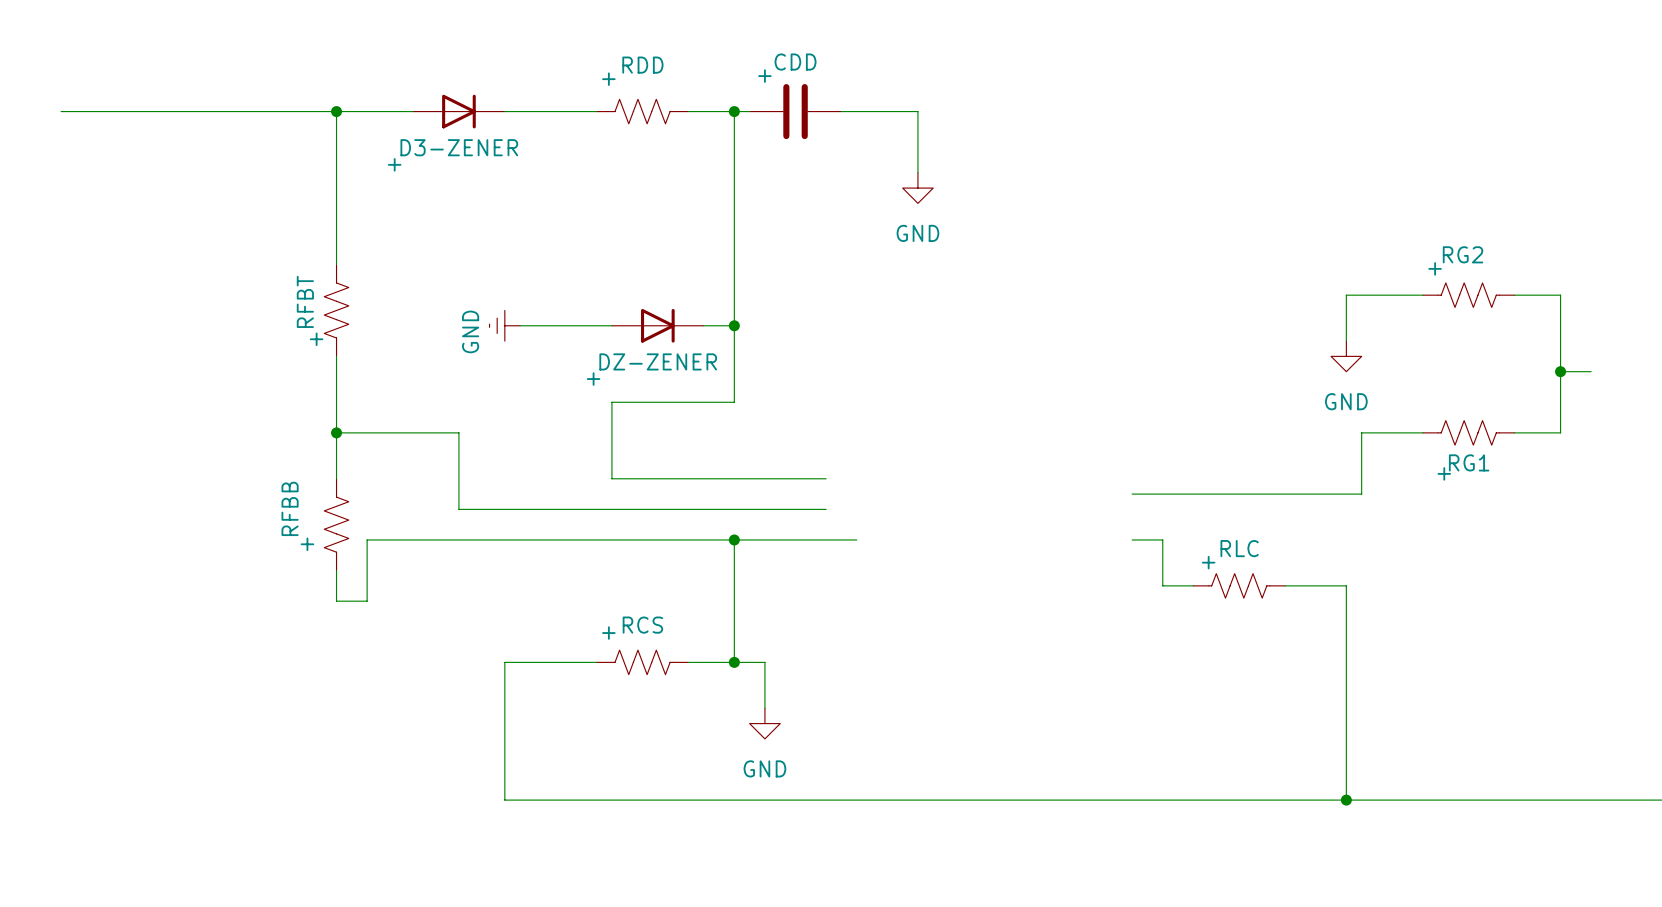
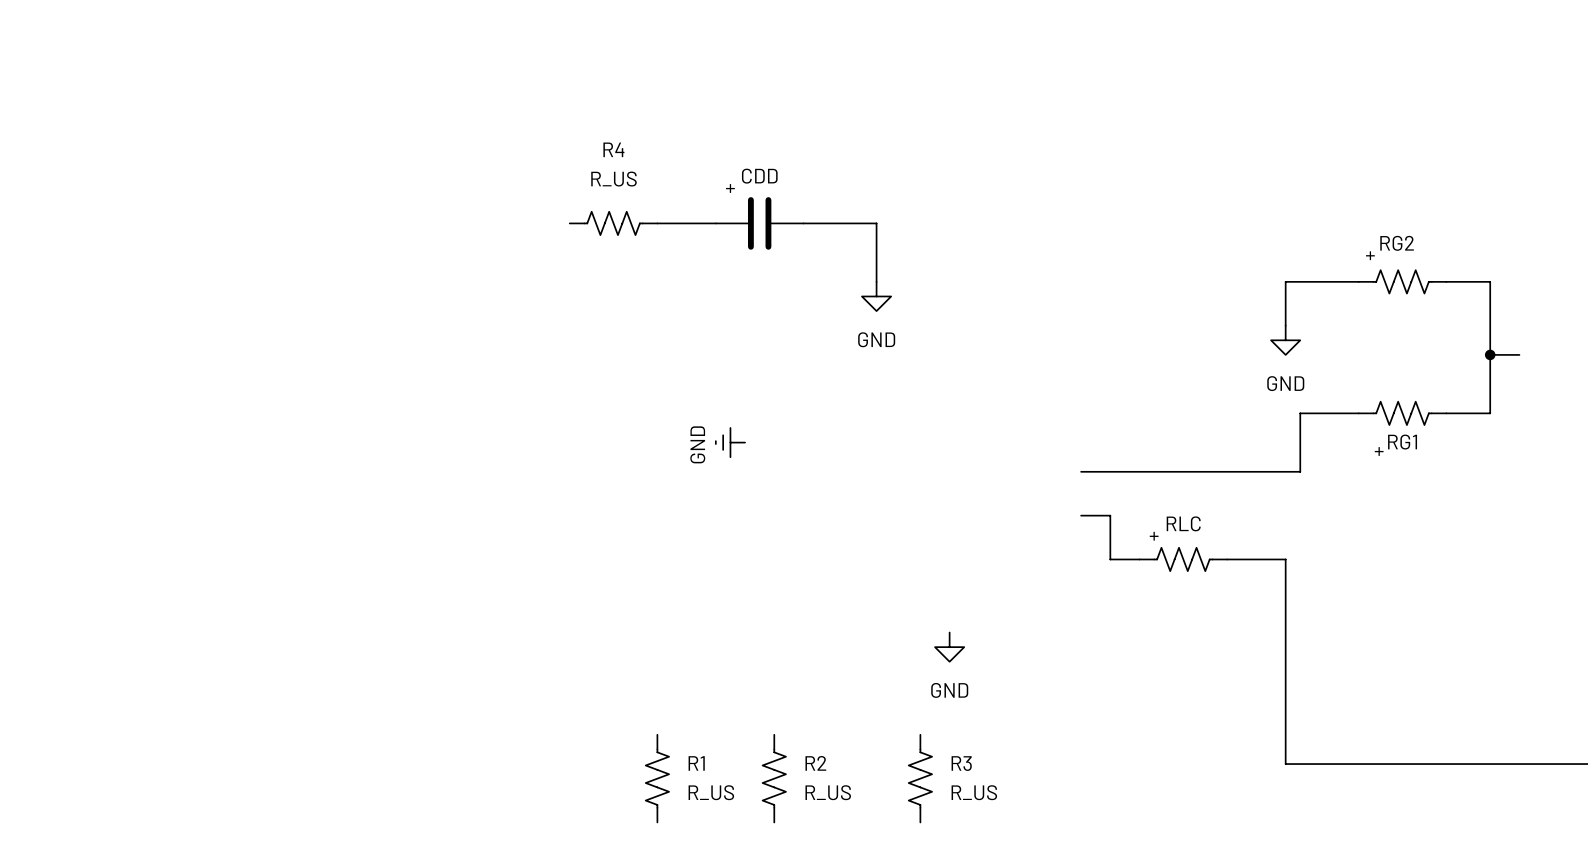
wire: (61, 111) (413, 111) -> none
wire: (336, 111) (336, 264) -> none
junction: (336, 111) -> none
part: D3-ZENER (458, 111) -> none
wire: (504, 111) (596, 111) -> none
part: RDD (642, 111) -> none
wire: (688, 111) (749, 111) -> (657, 223) (715, 223)
wire: (734, 111) (734, 402) (611, 402) (611, 478) (826, 478) -> none
junction: (734, 111) -> none
CDD position: (795, 111) -> (759, 223)
wire: (841, 111) (917, 111) (917, 172) -> (803, 223) (876, 223) (876, 281)
power symbol position: GND (917, 188) -> GND (876, 296)
R4: none -> R_US (613, 223)
part: RFBT (336, 310) -> none
power symbol position: GND (504, 325) -> GND (730, 442)
wire: (520, 325) (611, 325) -> none
part: DZ-ZENER (657, 325) -> none
wire: (703, 325) (734, 325) -> none
junction: (734, 325) -> none
wire: (336, 356) (336, 478) -> none
wire: (336, 432) (458, 432) (458, 509) (826, 509) -> none
junction: (336, 432) -> none
part: RFBB (336, 524) -> none
wire: (734, 539) (734, 662) -> none
junction: (734, 539) -> none
wire: (856, 539) (367, 539) (367, 601) (336, 601) (336, 570) -> none
wire: (596, 662) (504, 662) (504, 800) (1346, 800) -> none
part: RCS (642, 662) -> none
wire: (688, 662) (764, 662) (764, 708) -> none
junction: (734, 662) -> none
power symbol: none -> GND (949, 647)
power symbol: GND (764, 723) -> none
junction: (1346, 800) -> none
R1: none -> R_US (657, 778)
R2: none -> R_US (774, 778)
R3: none -> R_US (920, 778)

